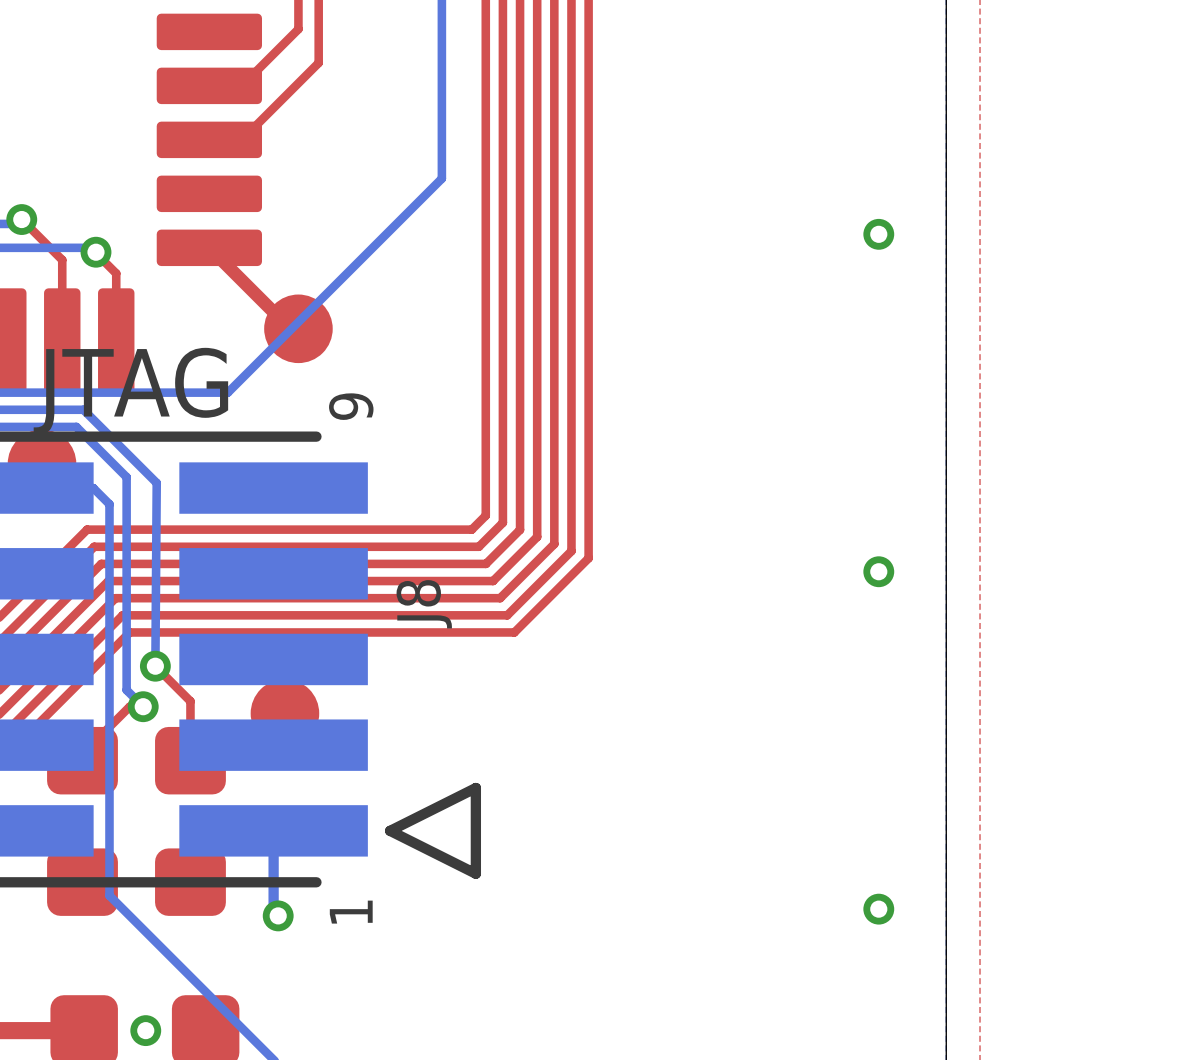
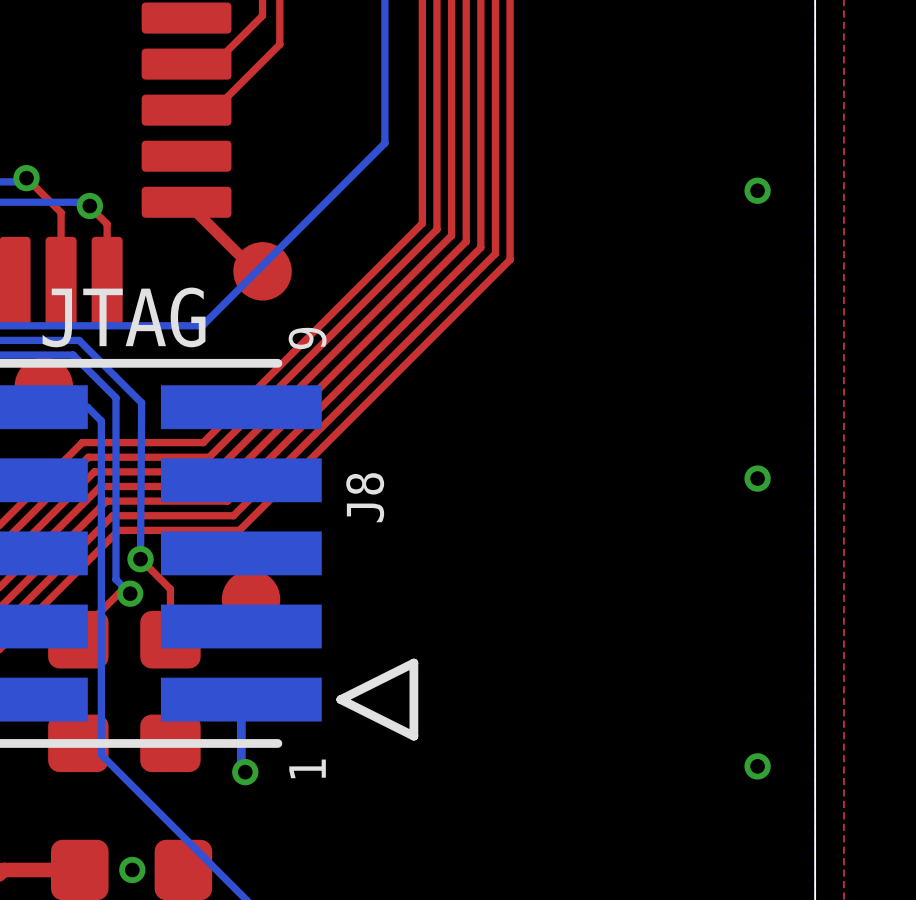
top track: (485, 272) (485, 515) (471, 529) (228, 529) -> (422, 223) (203, 442)
top track: (502, 279) (502, 522) (478, 546) (235, 546) -> (436, 229) (209, 457)
top track: (520, 286) (520, 529) (485, 563) (243, 563) -> (451, 235) (215, 471)
top track: (537, 294) (537, 536) (493, 581) (250, 581) -> (466, 241) (221, 486)
top track: (554, 301) (554, 544) (500, 598) (257, 598) -> (480, 247) (227, 501)
top track: (571, 308) (571, 551) (507, 615) (264, 615) -> (495, 253) (233, 515)
top track: (588, 315) (588, 558) (514, 632) (271, 632) -> (510, 259) (239, 530)

